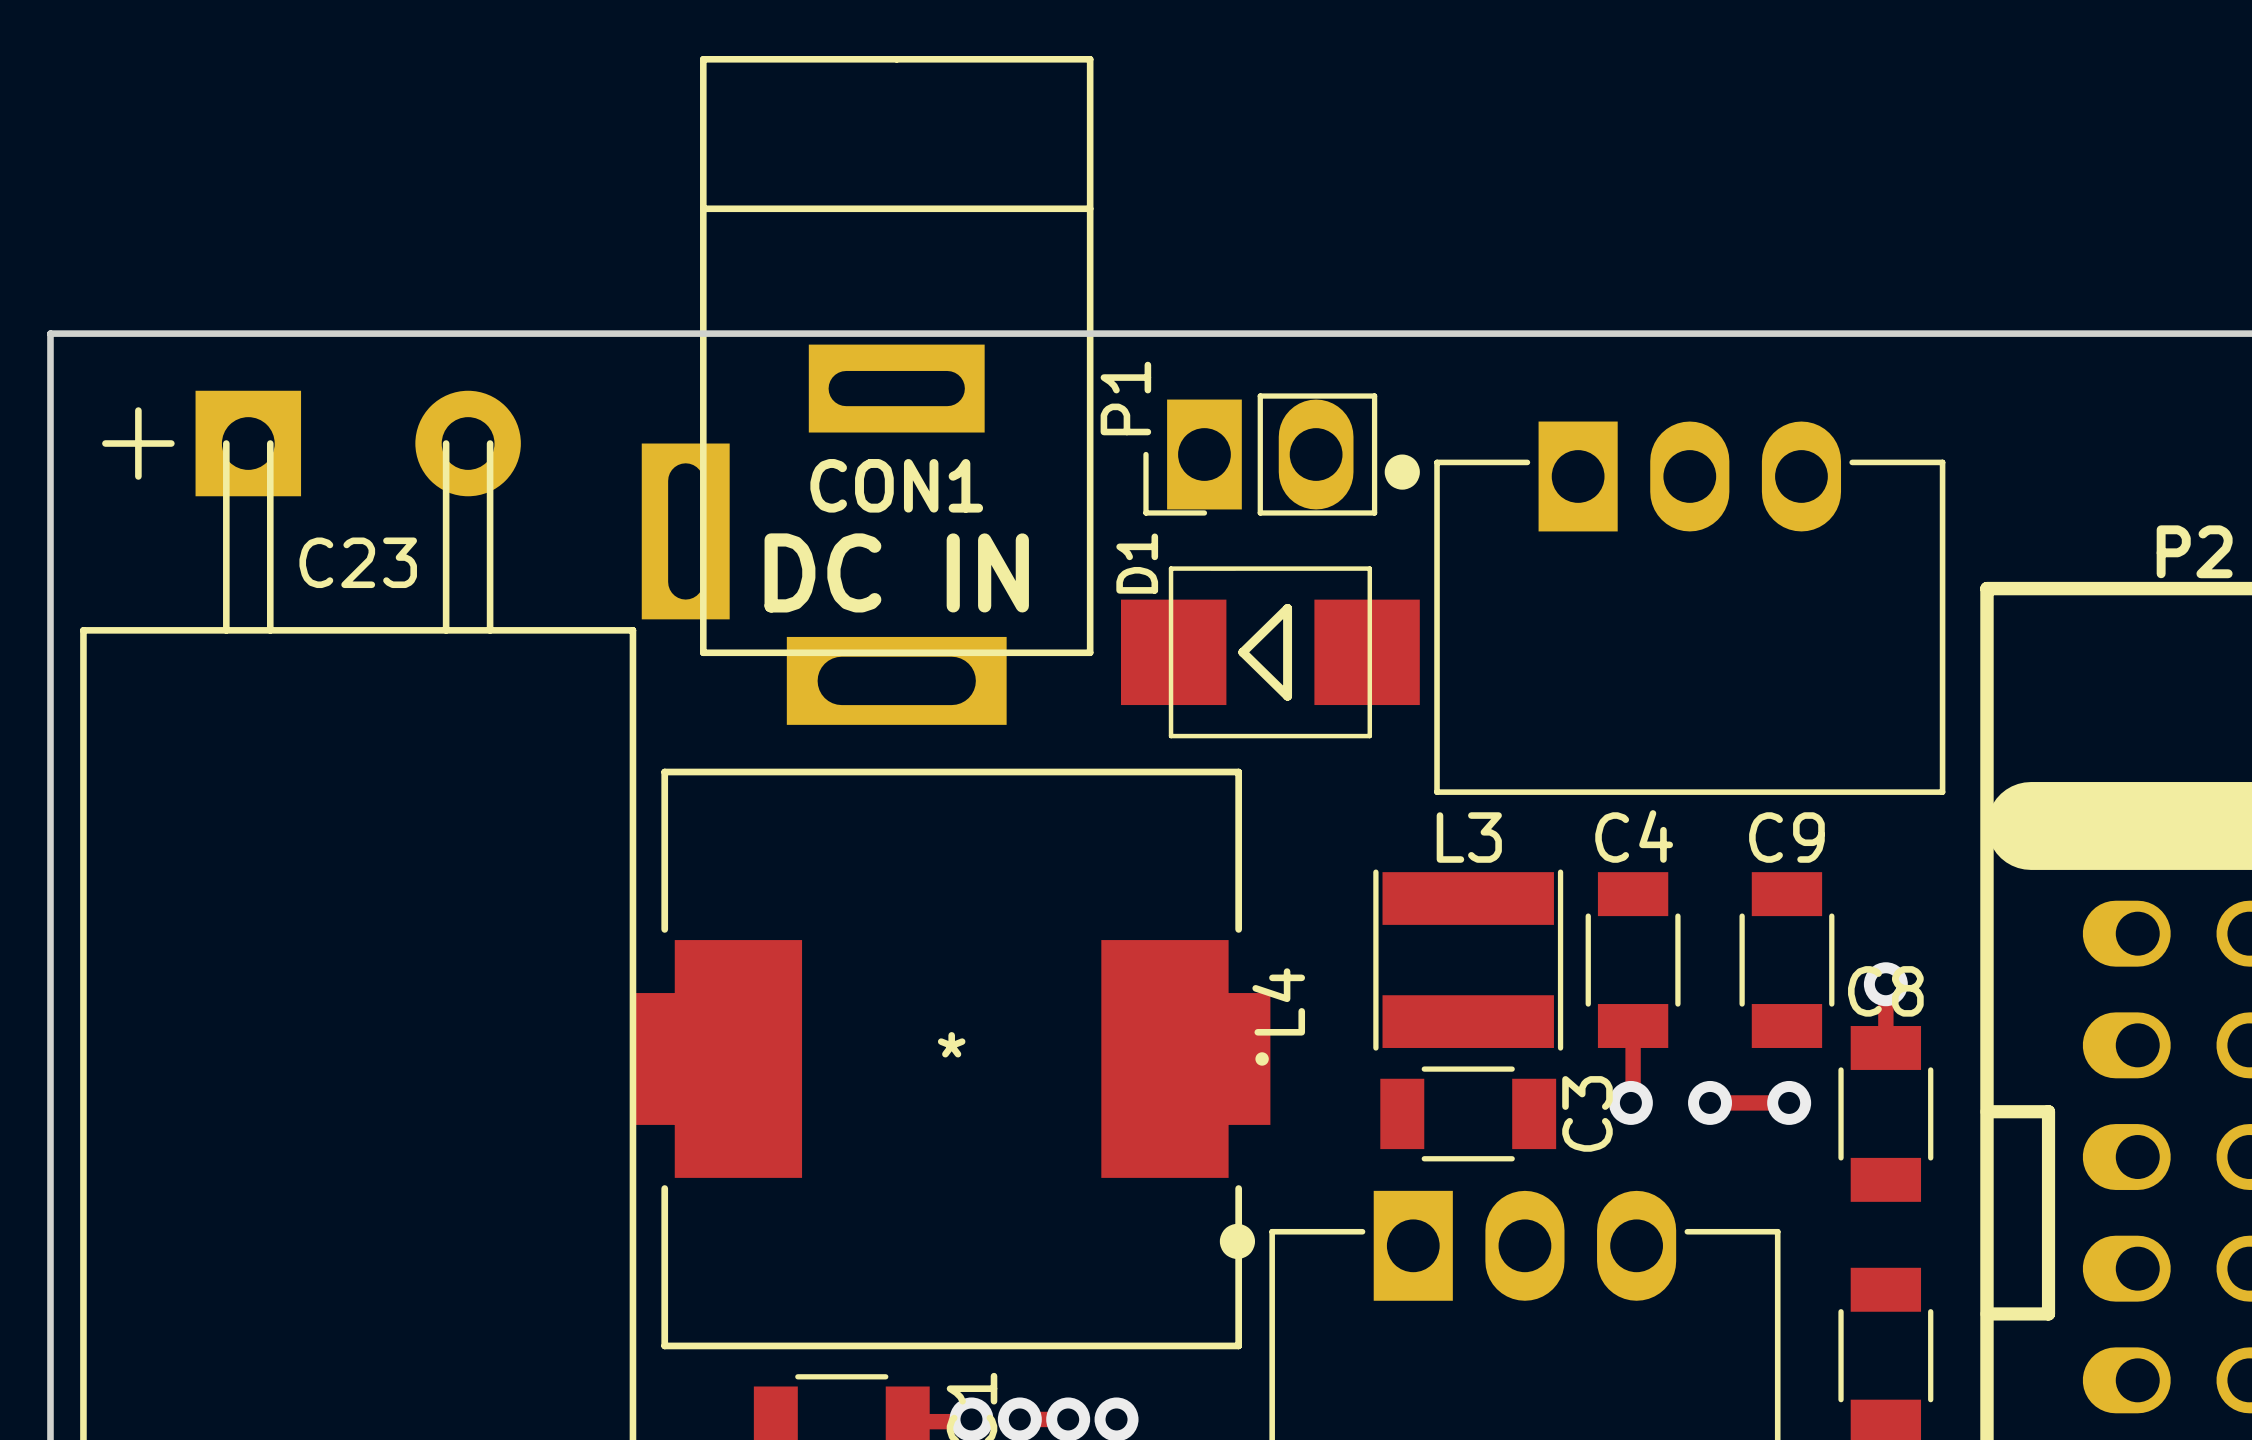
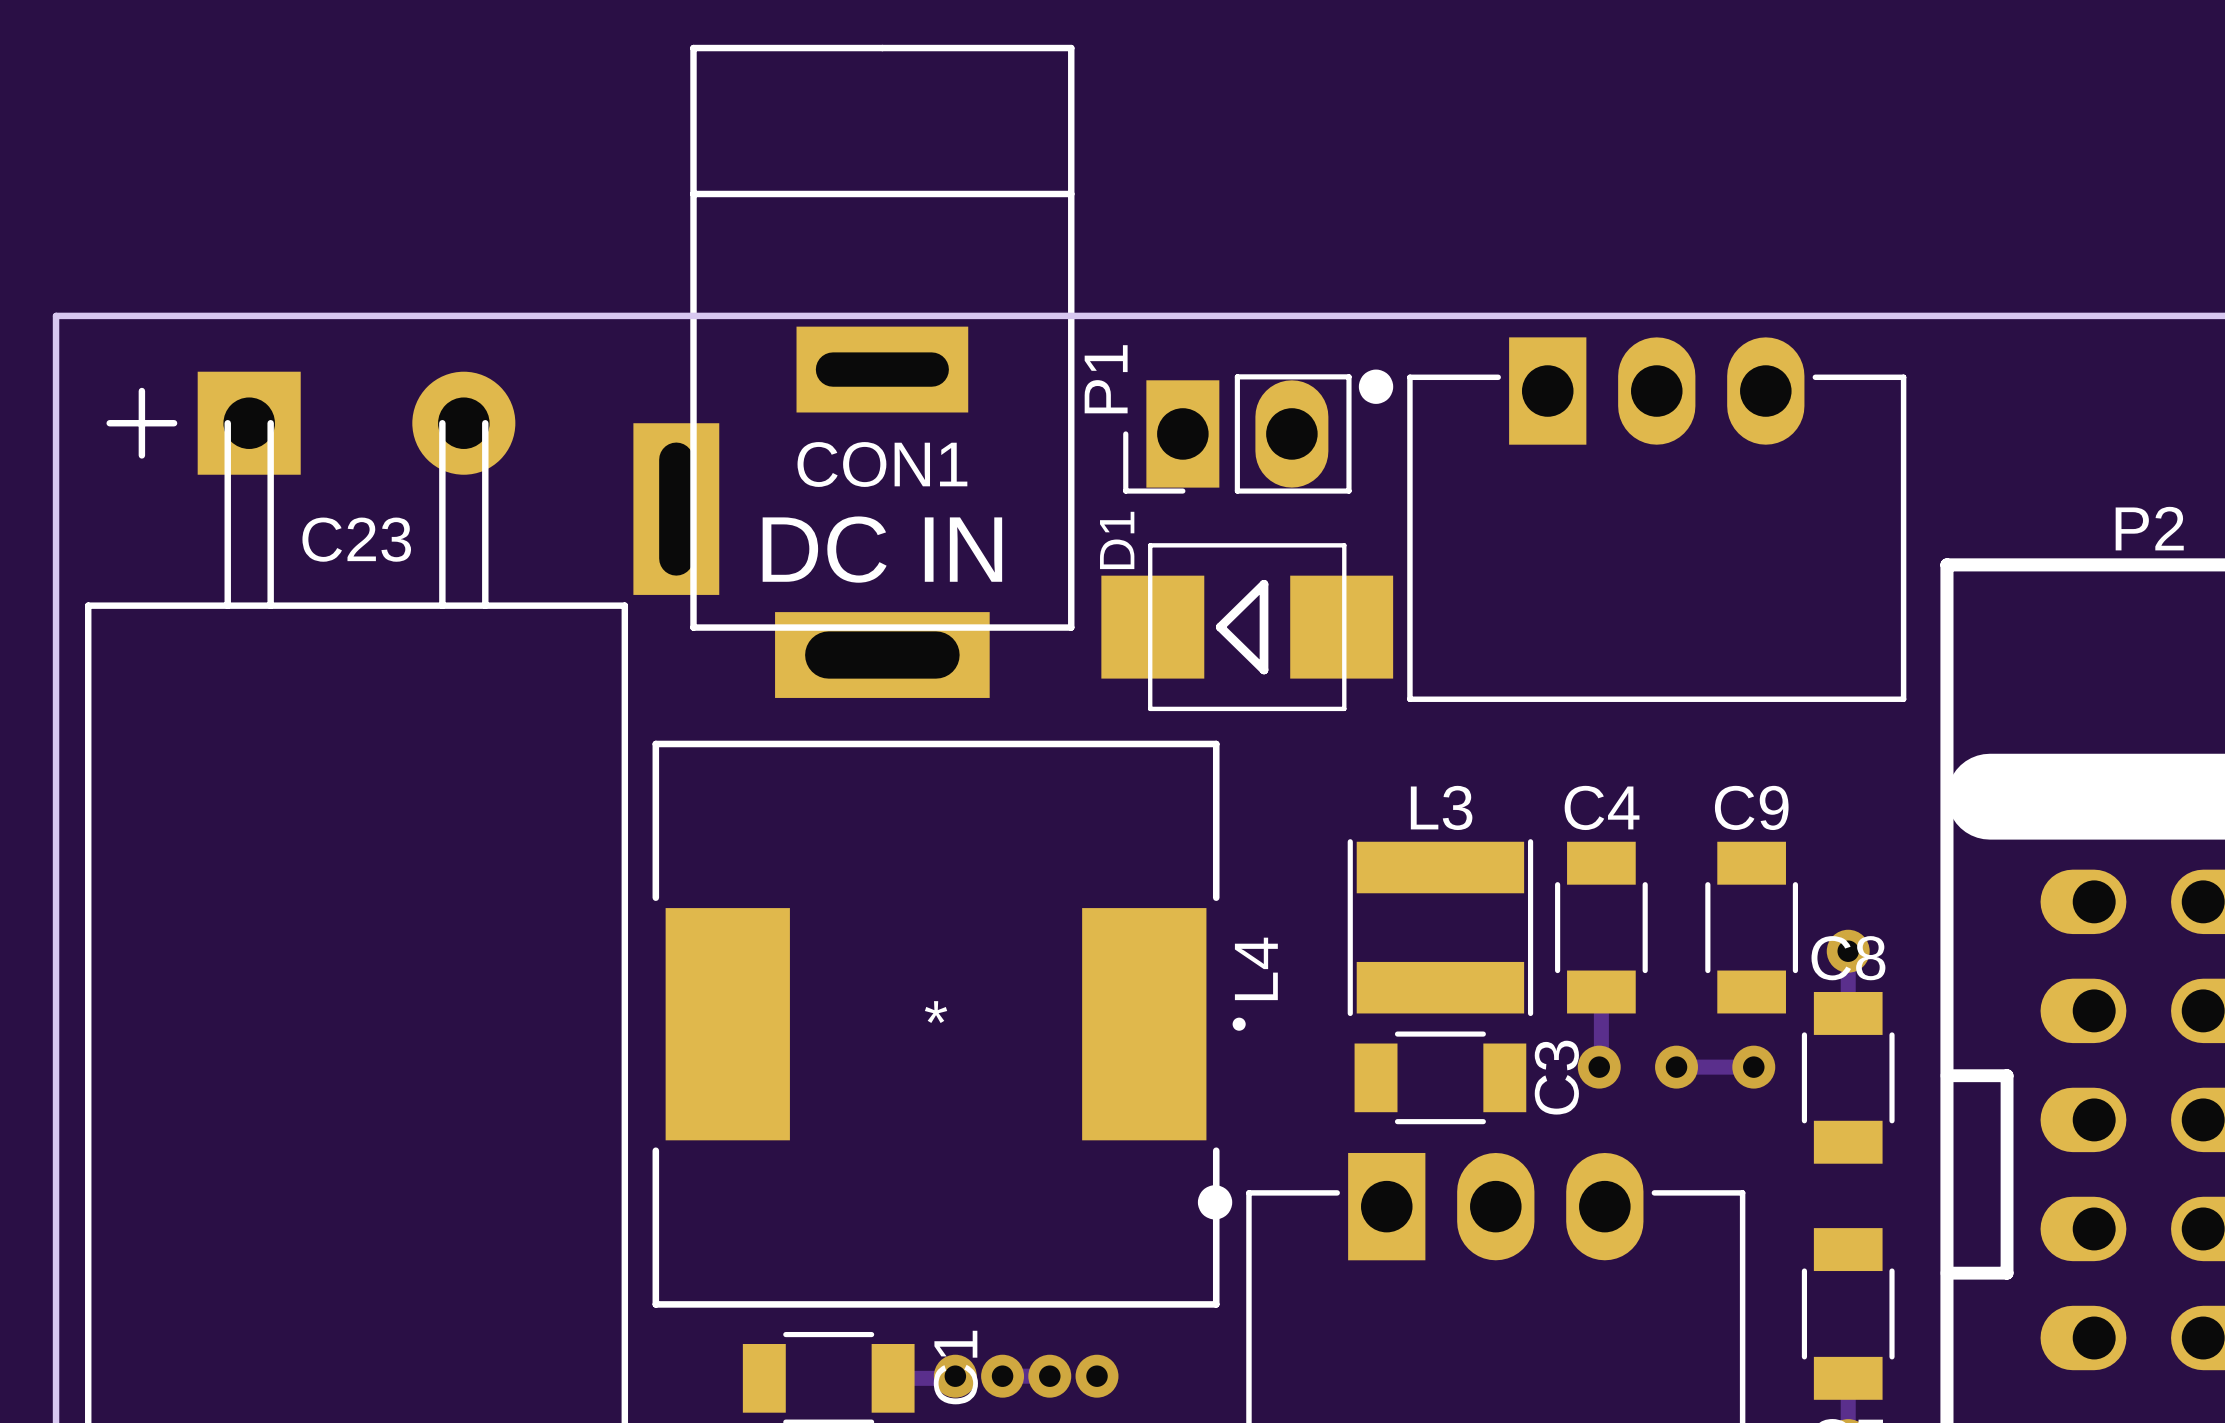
part position: (1665, 608) -> (1632, 519)
L4 footprint: [632, 768, 1271, 1350] -> [652, 740, 1246, 1308]

